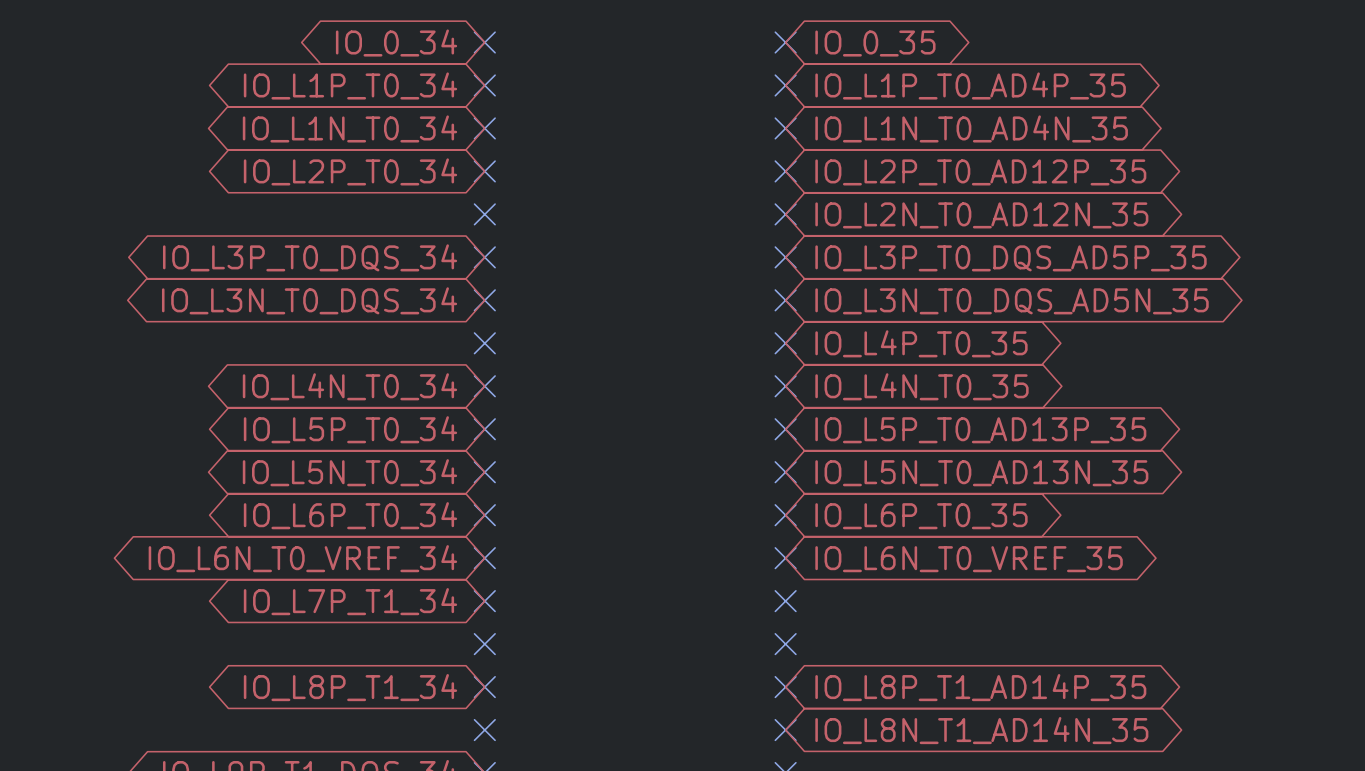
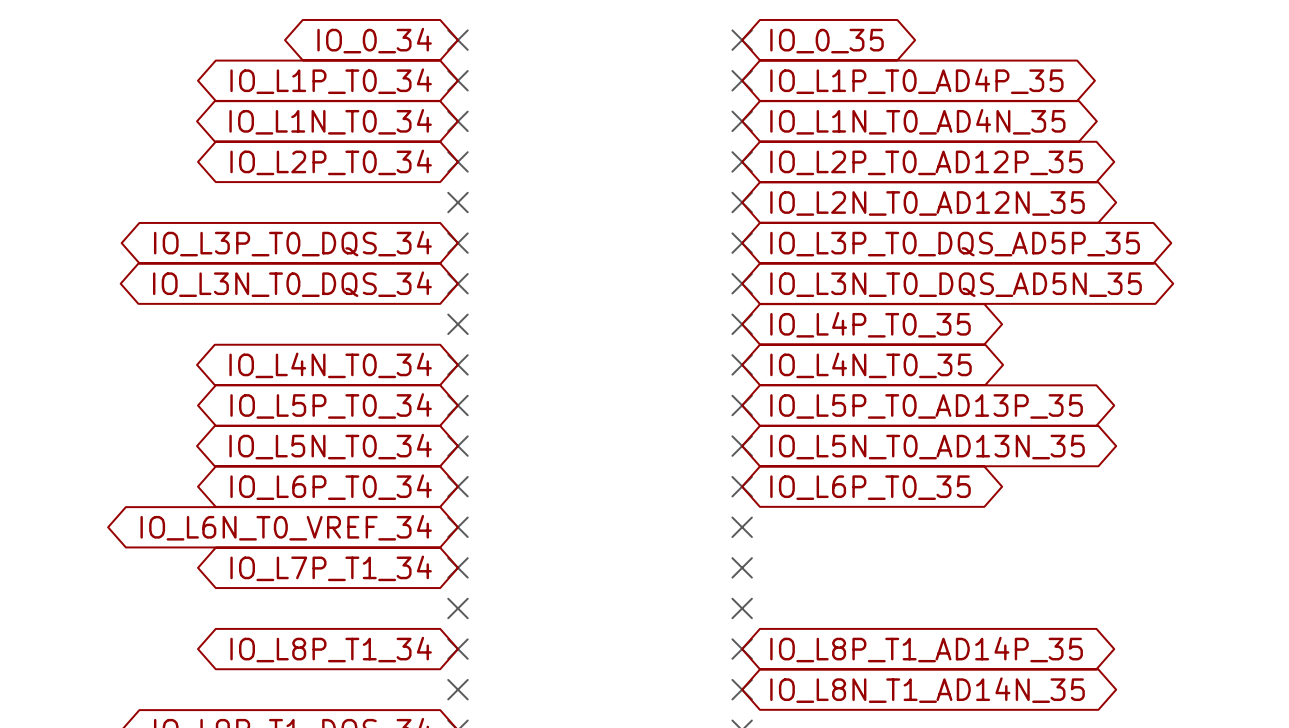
global label: IO_L6N_T0_VREF_35 (969, 559) -> none

